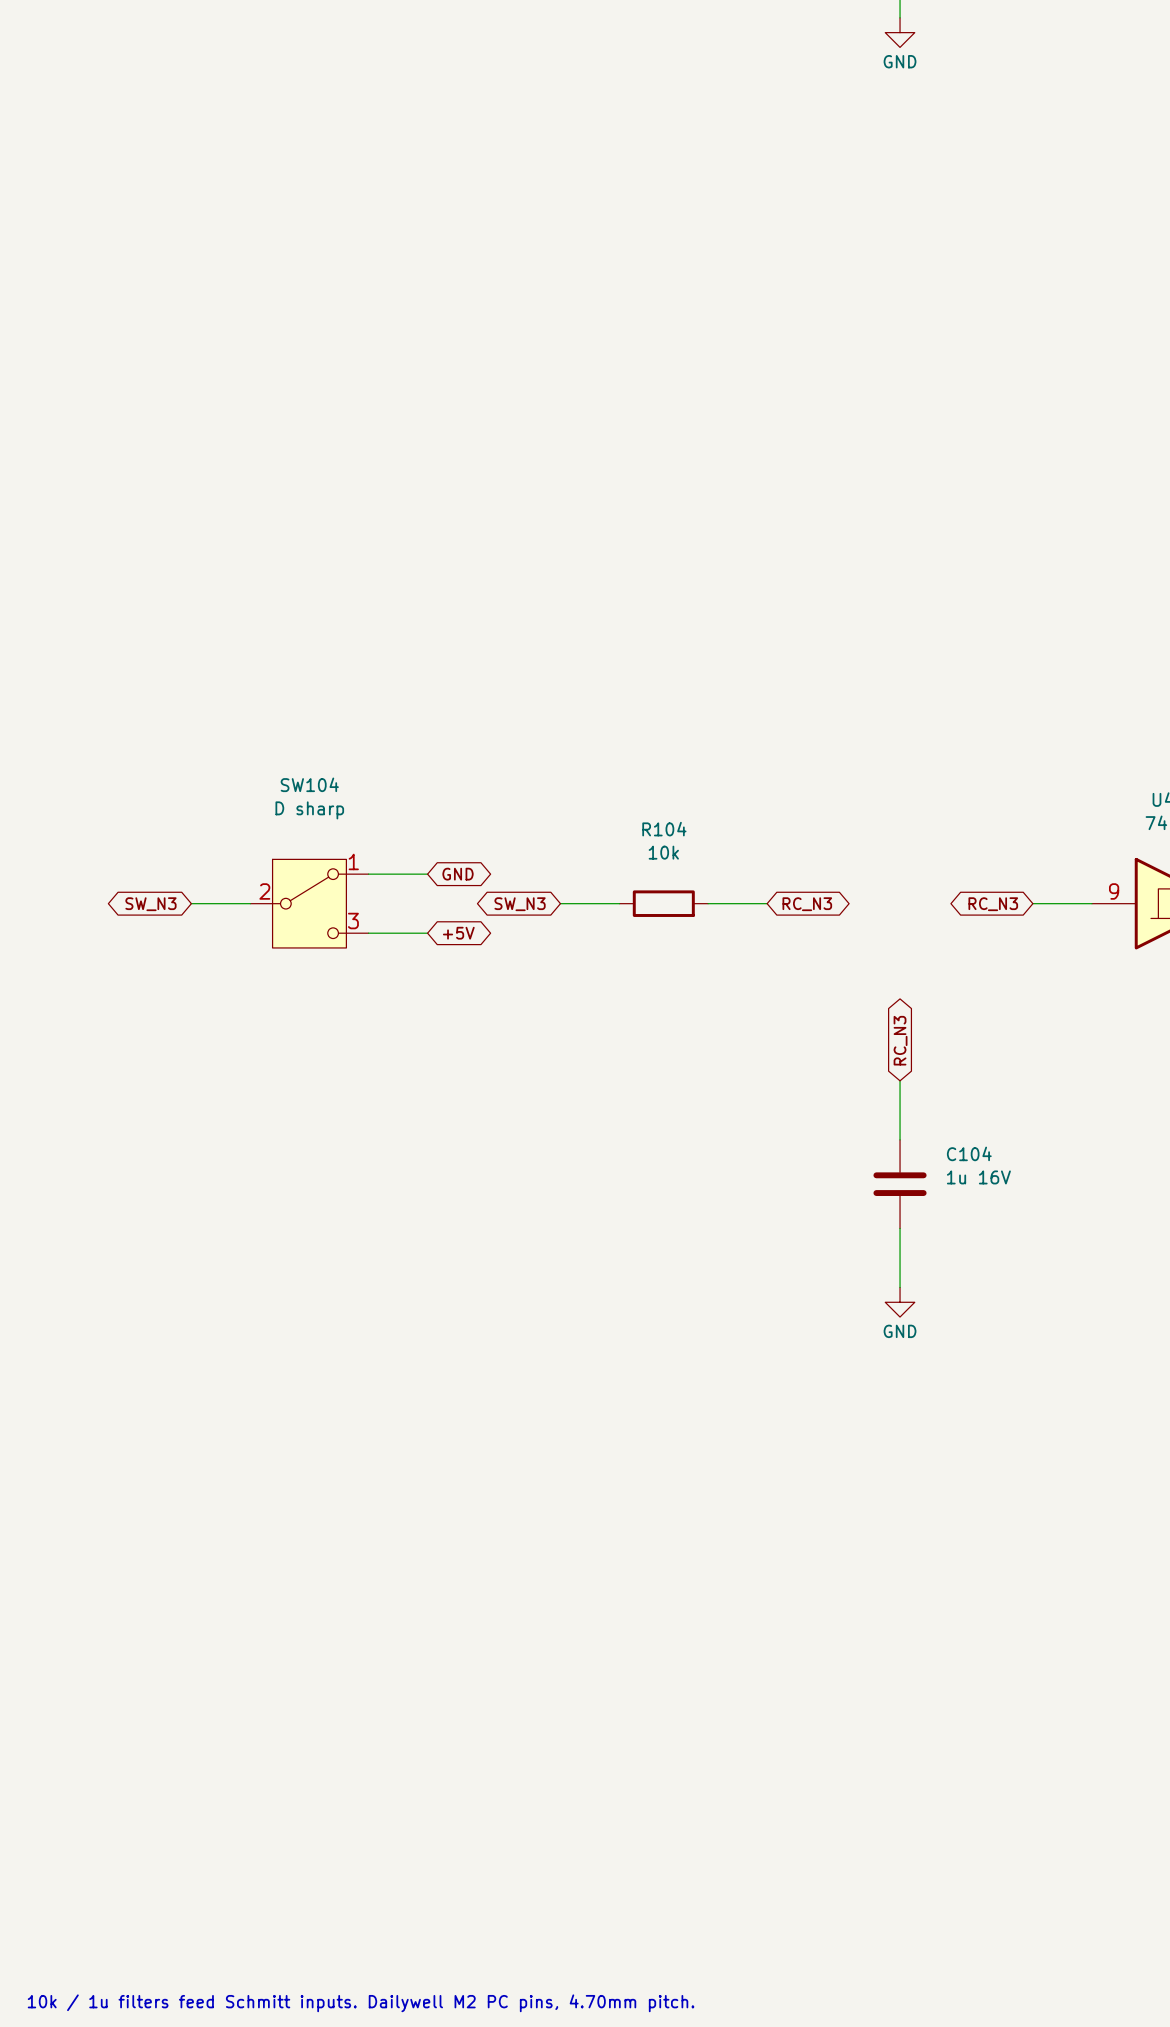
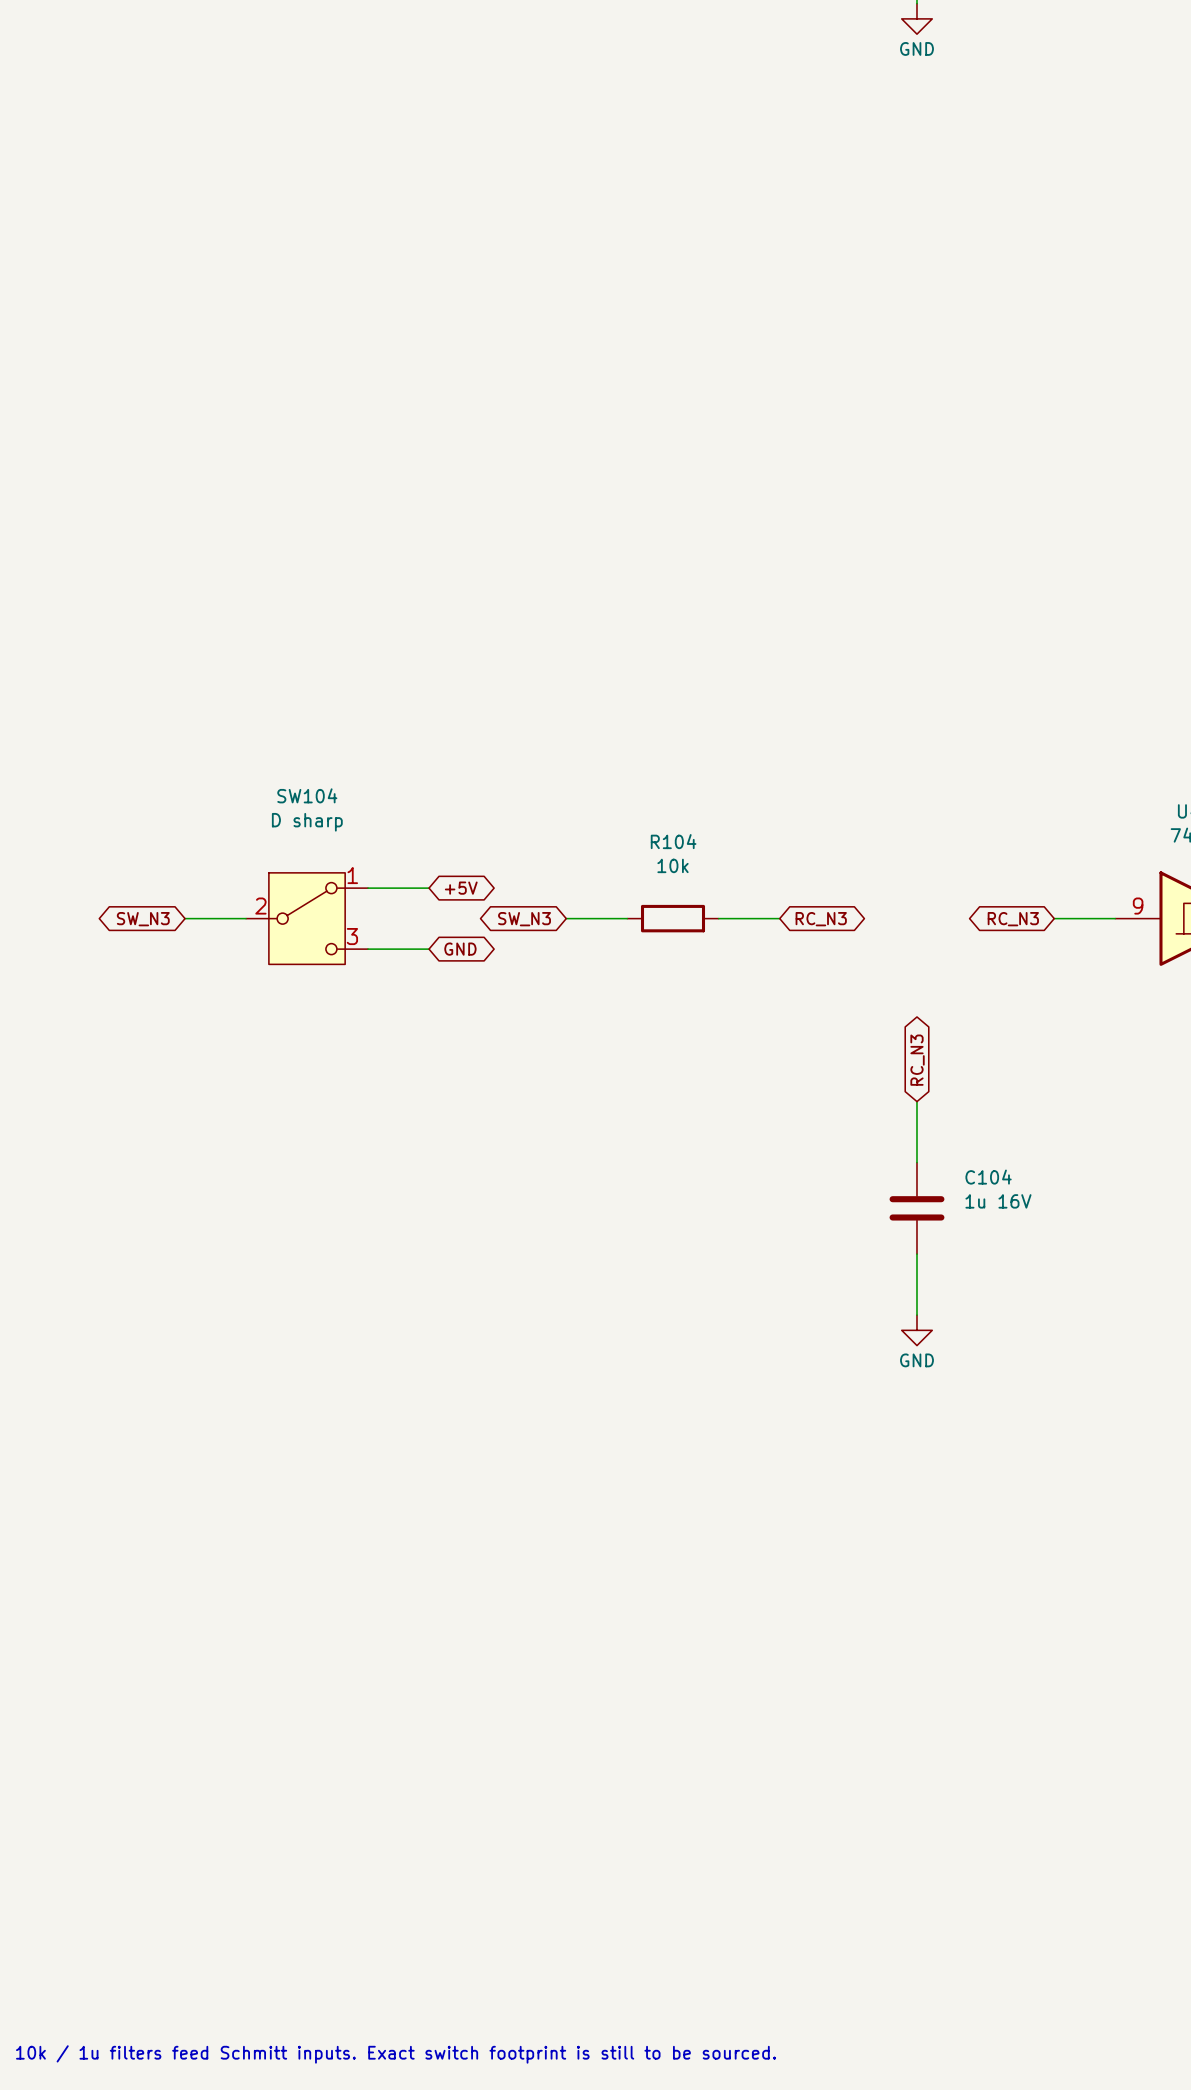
global label: GND (458, 874) -> +5V (461, 888)
global label: +5V (458, 933) -> GND (460, 949)
text: 10k / 1u filters feed Schmitt inputs. Dailywell M2 PC pins, 4.70mm pitch. (361, 2003) -> 10k / 1u filters feed Schmitt inputs. Exact switch footprint is still to be sourced. (396, 2054)

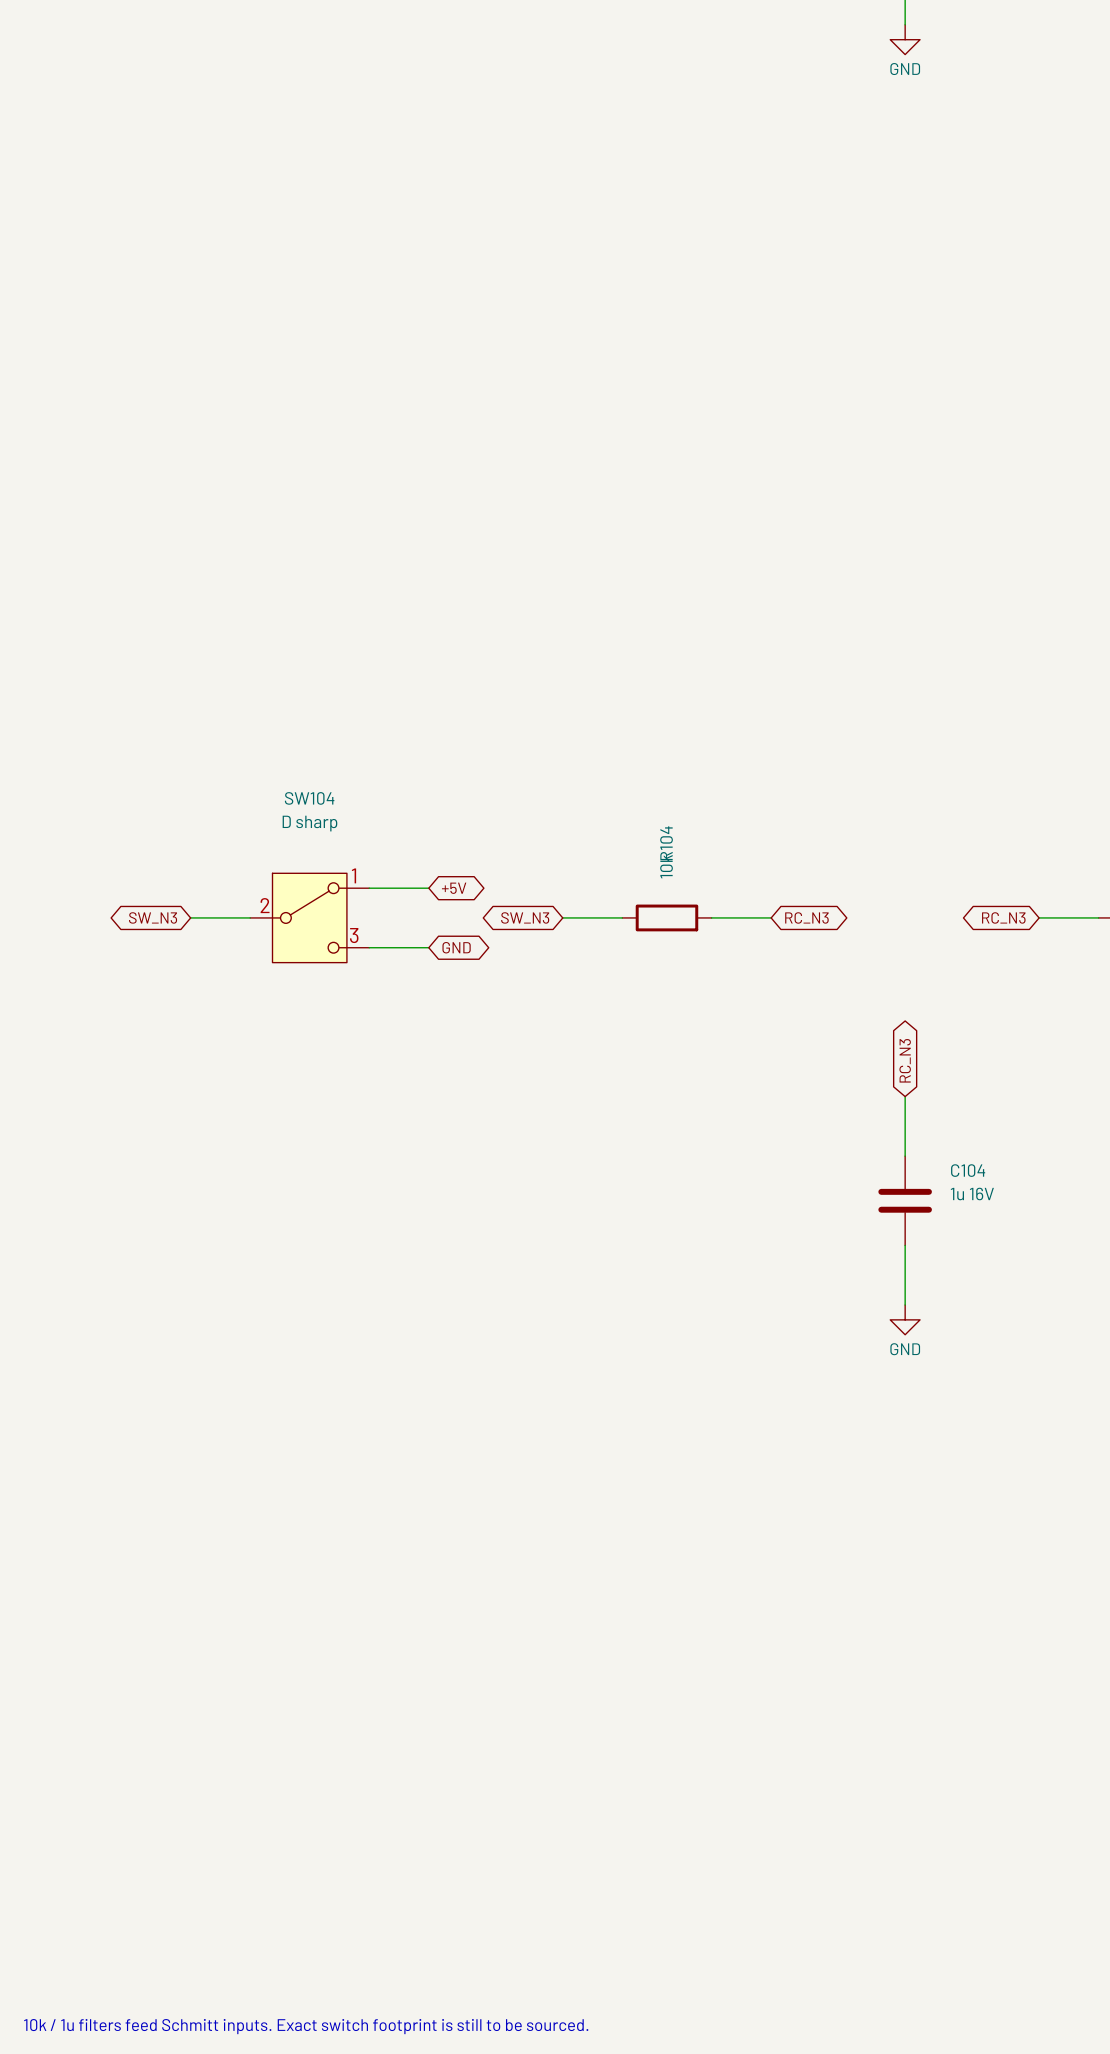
R104 name rotation: 0° (673, 841) -> 90° counterclockwise (666, 843)
R104 value rotation: 0° (673, 865) -> 90° counterclockwise (666, 866)

